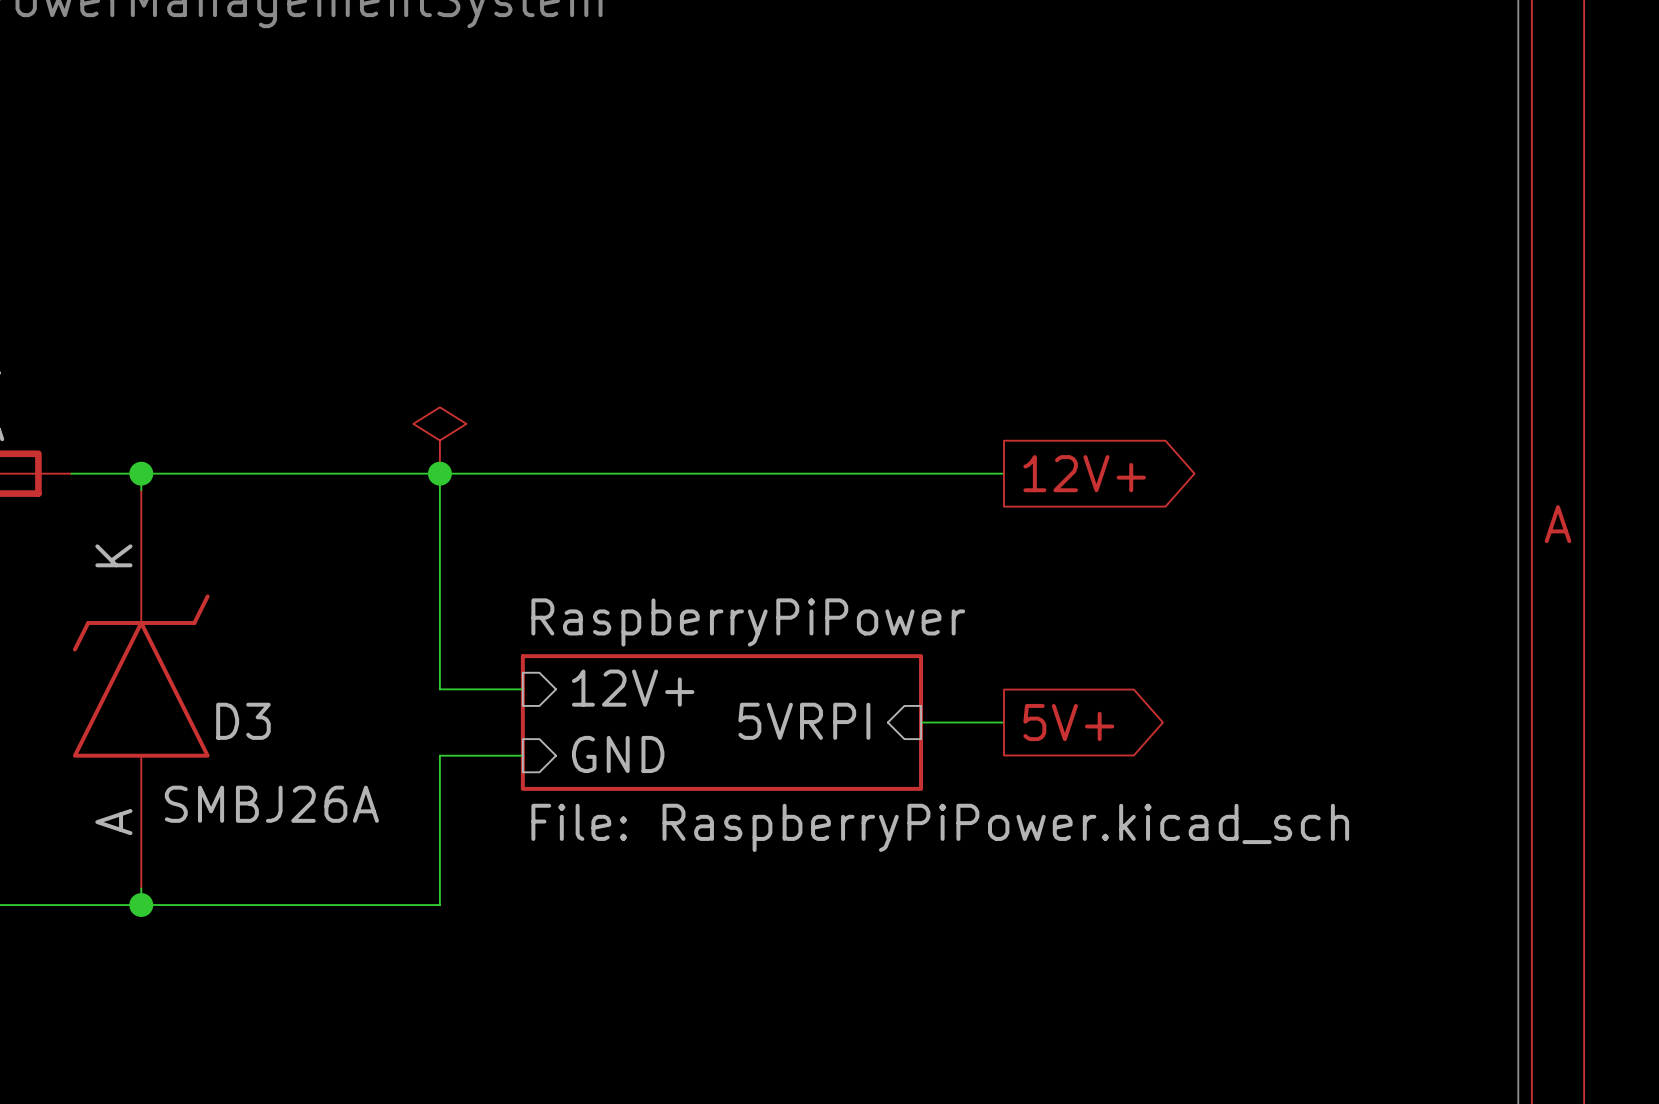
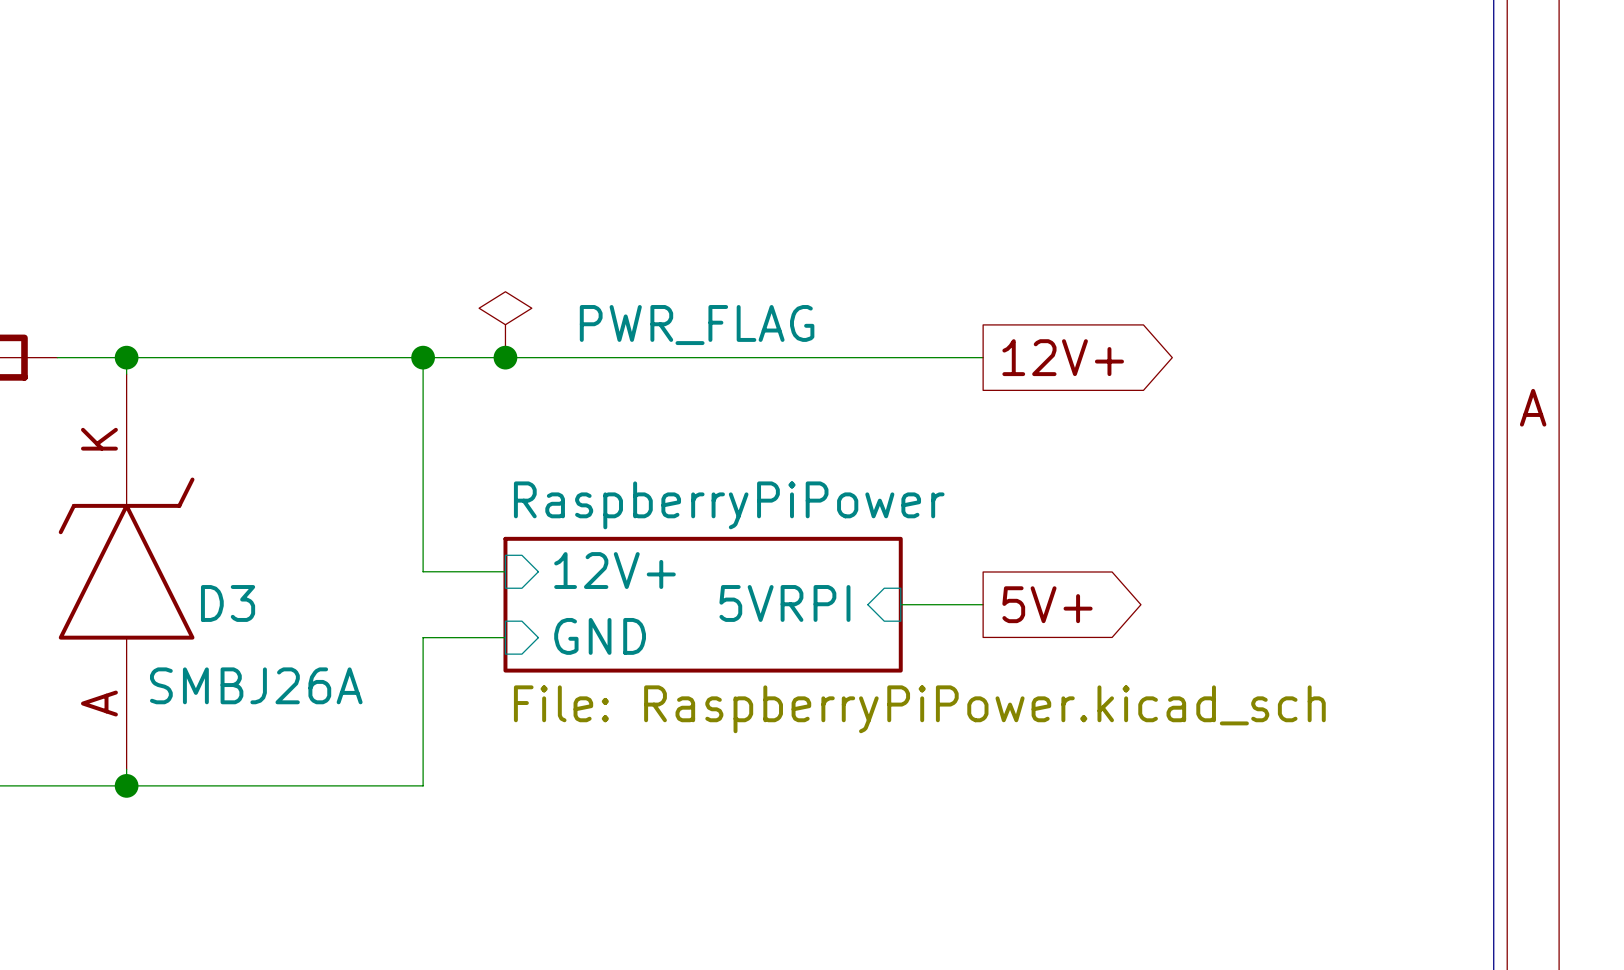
power symbol: (439, 440) -> none
power symbol: none -> PWR_FLAG (505, 324)
junction: none -> (505, 357)

